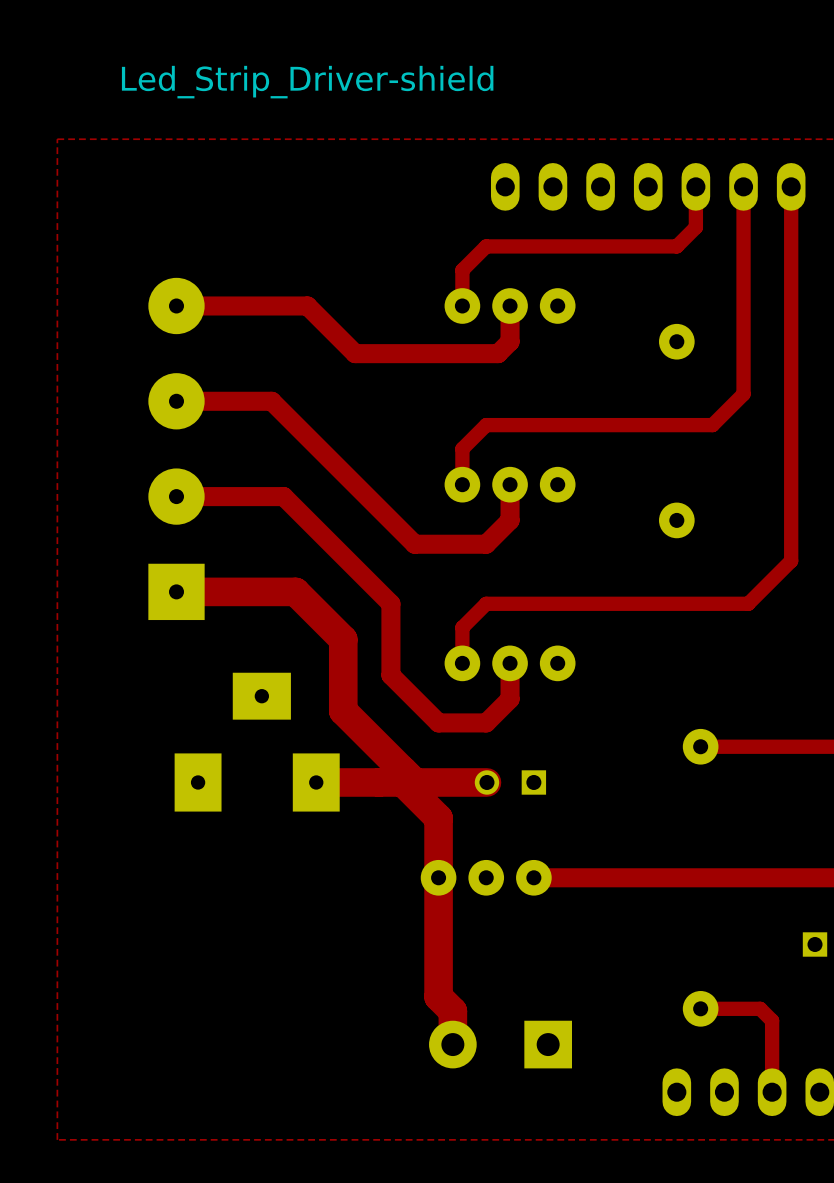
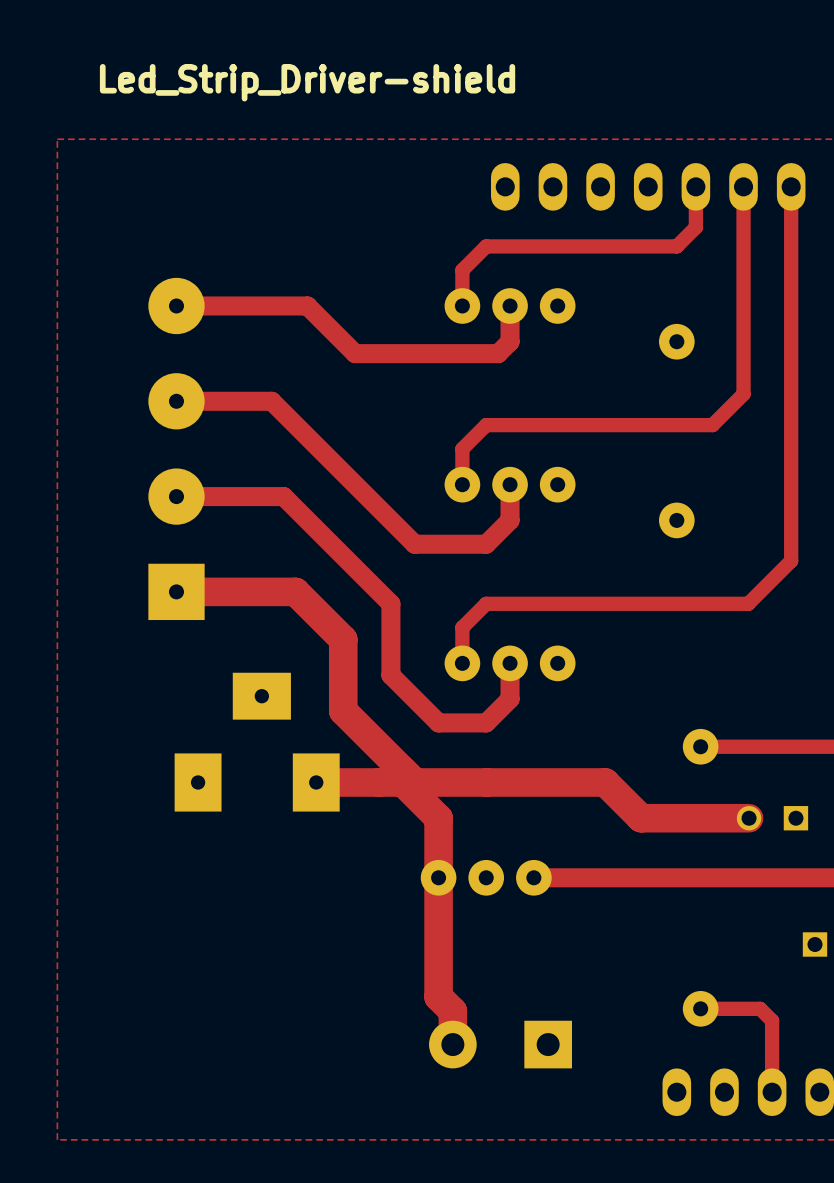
top track: none -> (486, 782) (605, 782) (641, 818) (749, 818)
part position: (510, 782) -> (772, 818)

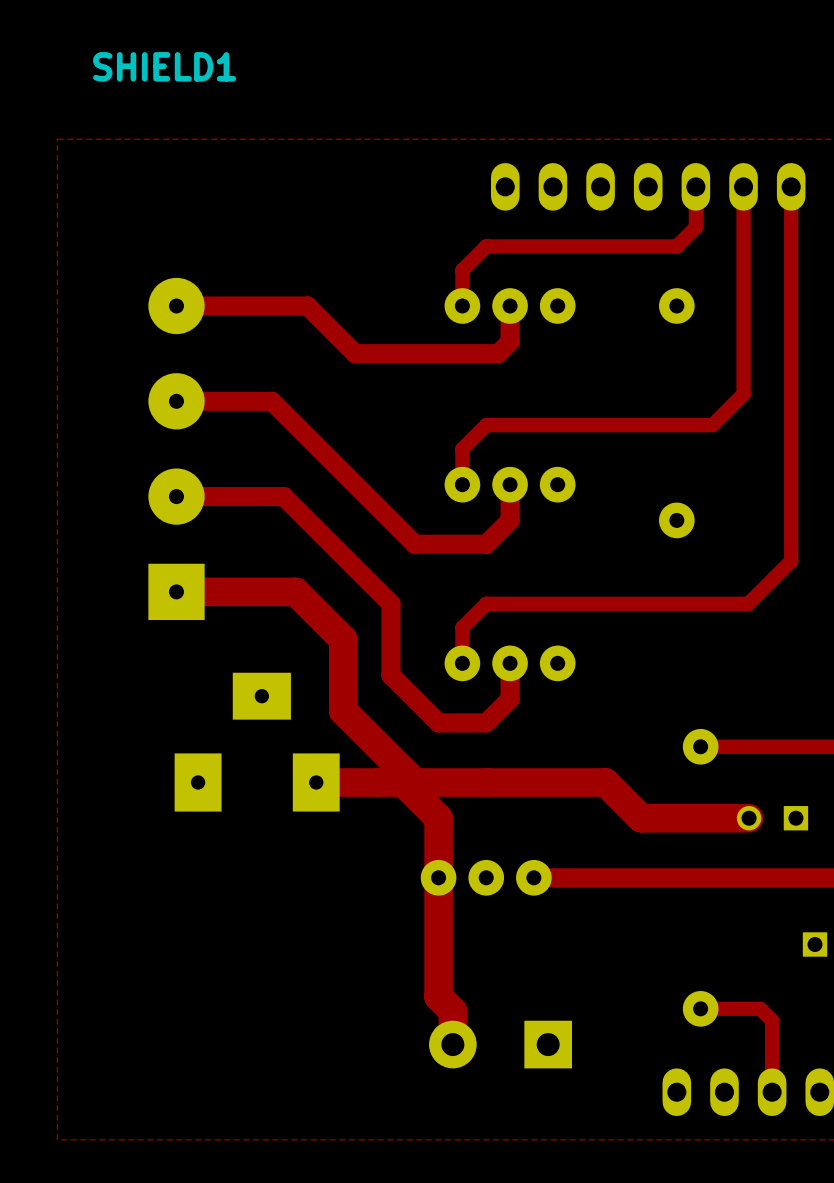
Led_Strip_Driver-shield name: Led_Strip_Driver-shield (307, 82) -> SHIELD1 (164, 66)
part position: (676, 341) -> (676, 305)

